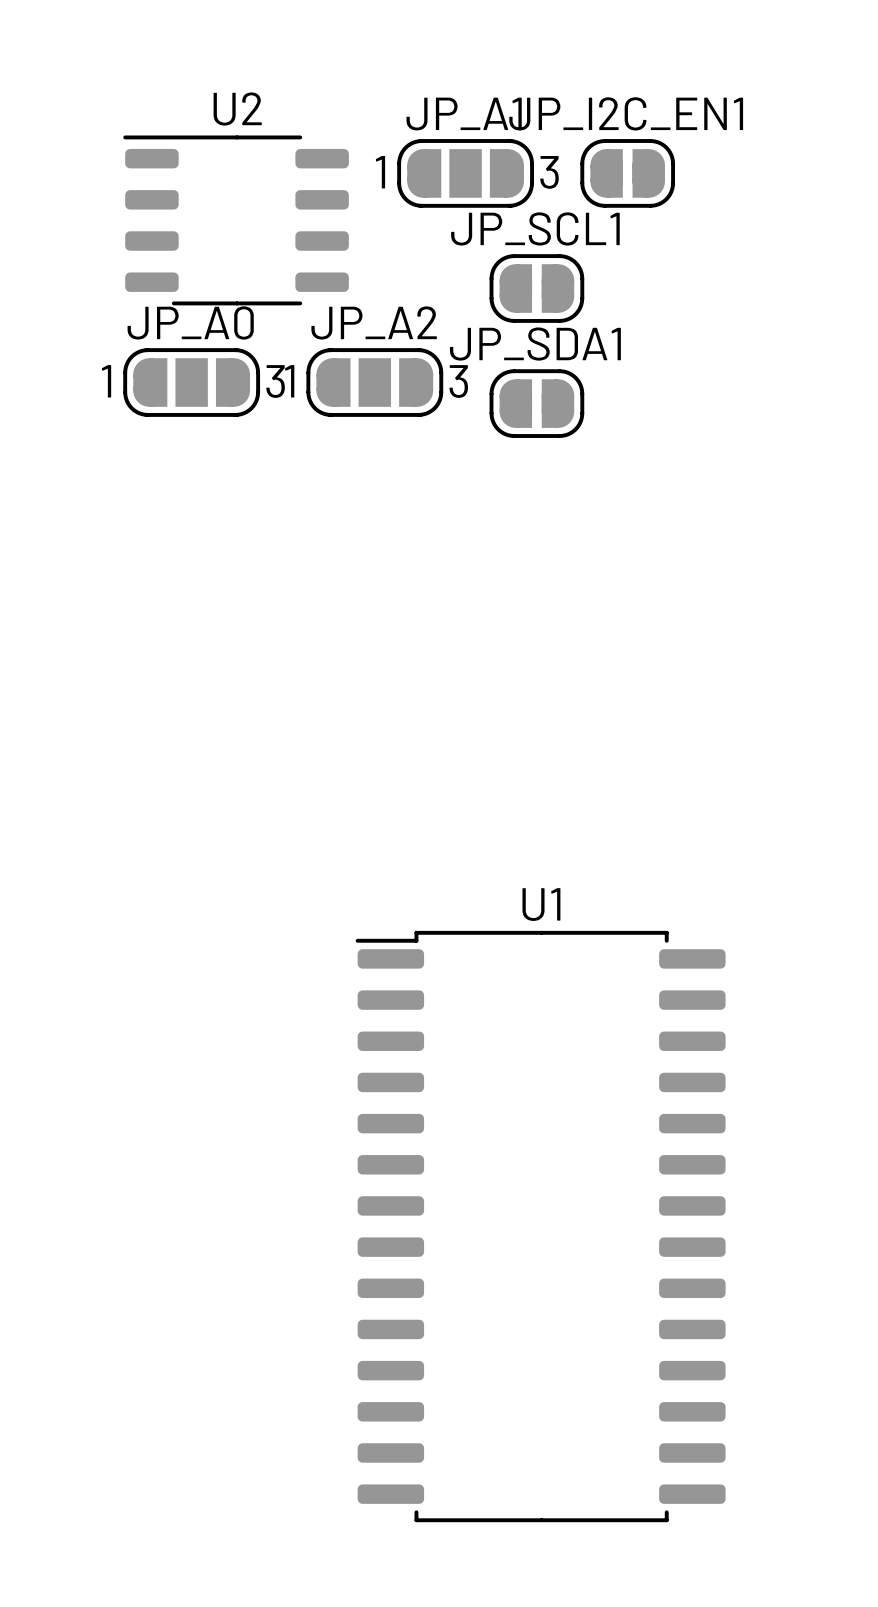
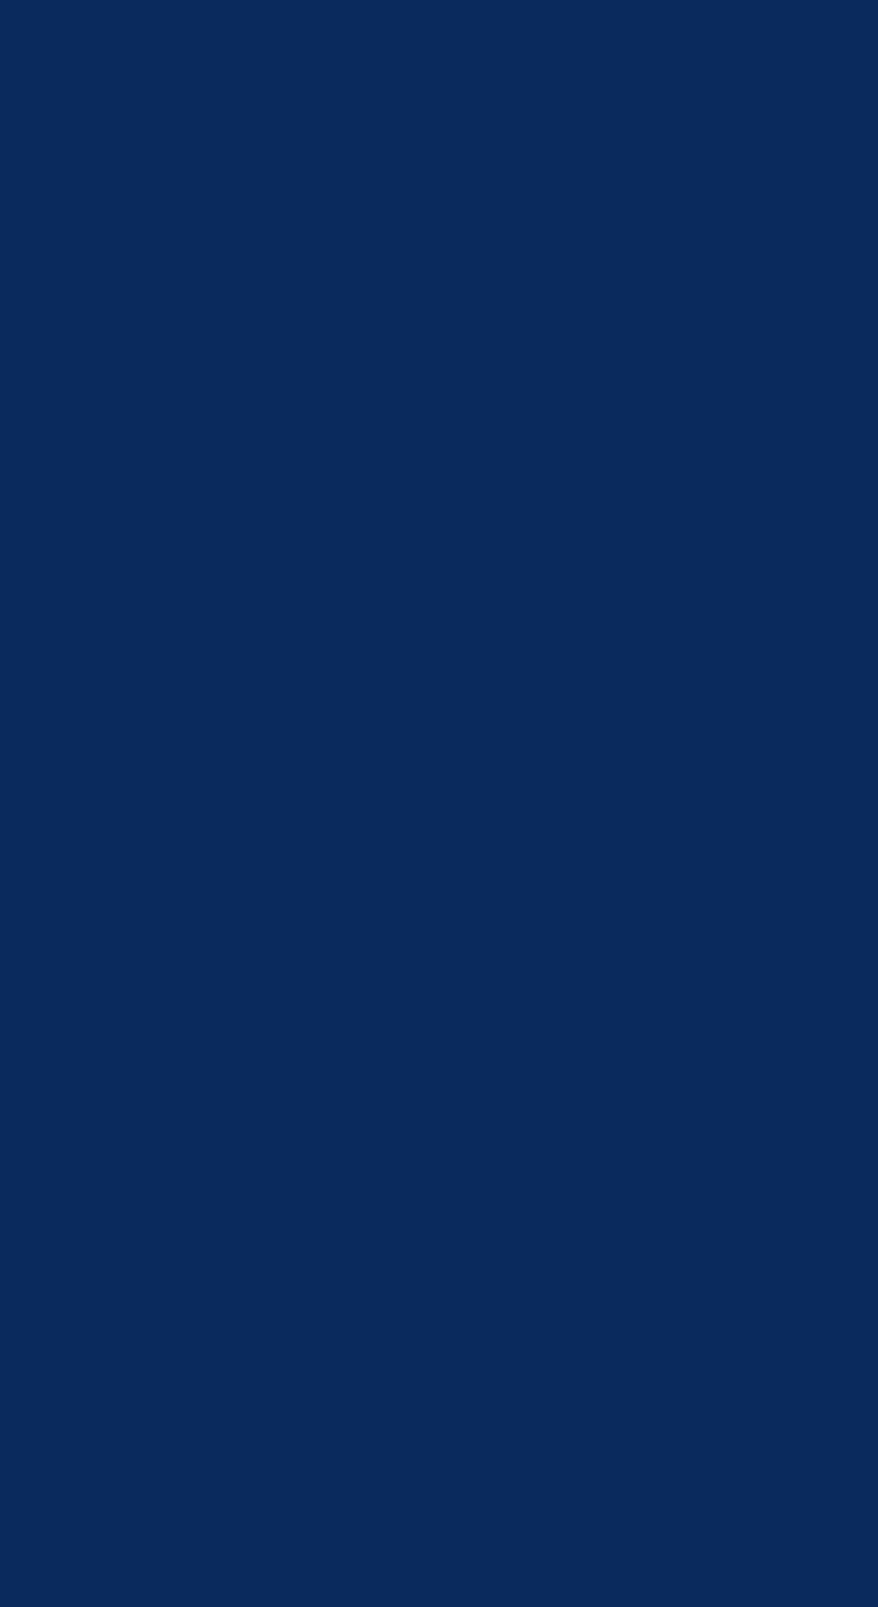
JP_A1: (465, 173) -> none
JP_I2C_EN1: (627, 173) -> none
U2: (236, 220) -> none
JP_SCL1: (536, 288) -> none
JP_A0: (191, 382) -> none
JP_A2: (374, 382) -> none
JP_SDA1: (536, 403) -> none
U1: (540, 1226) -> none

